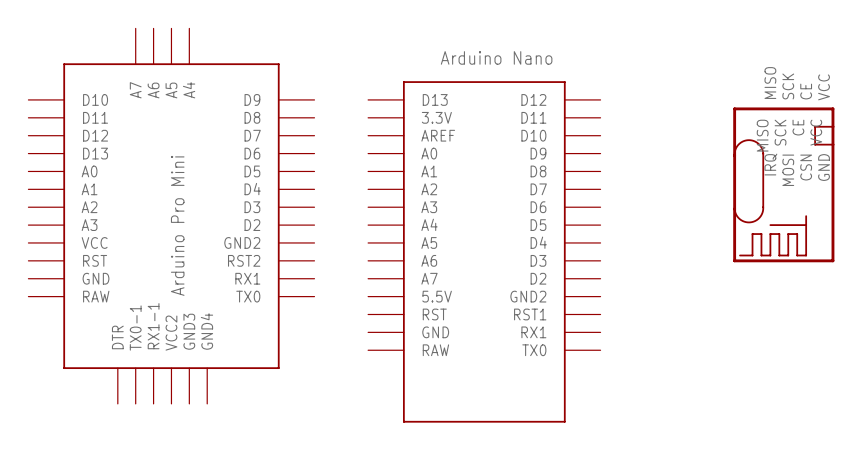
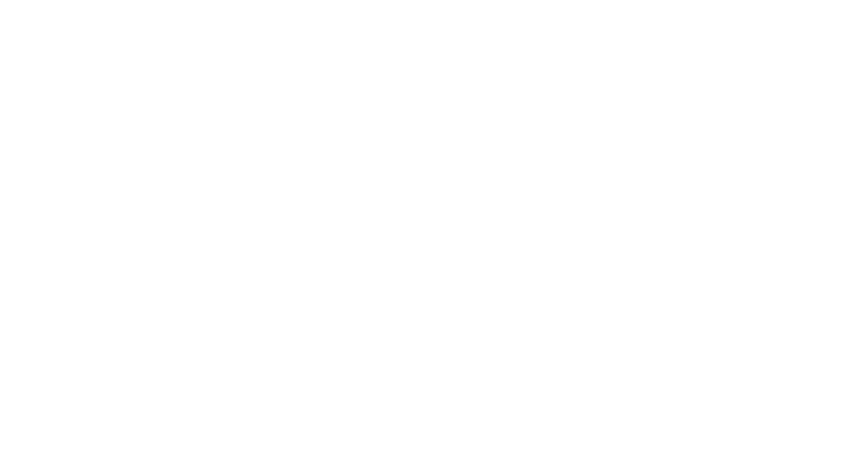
part: (783, 184) -> none
part: (171, 216) -> none
part: (484, 251) -> none

